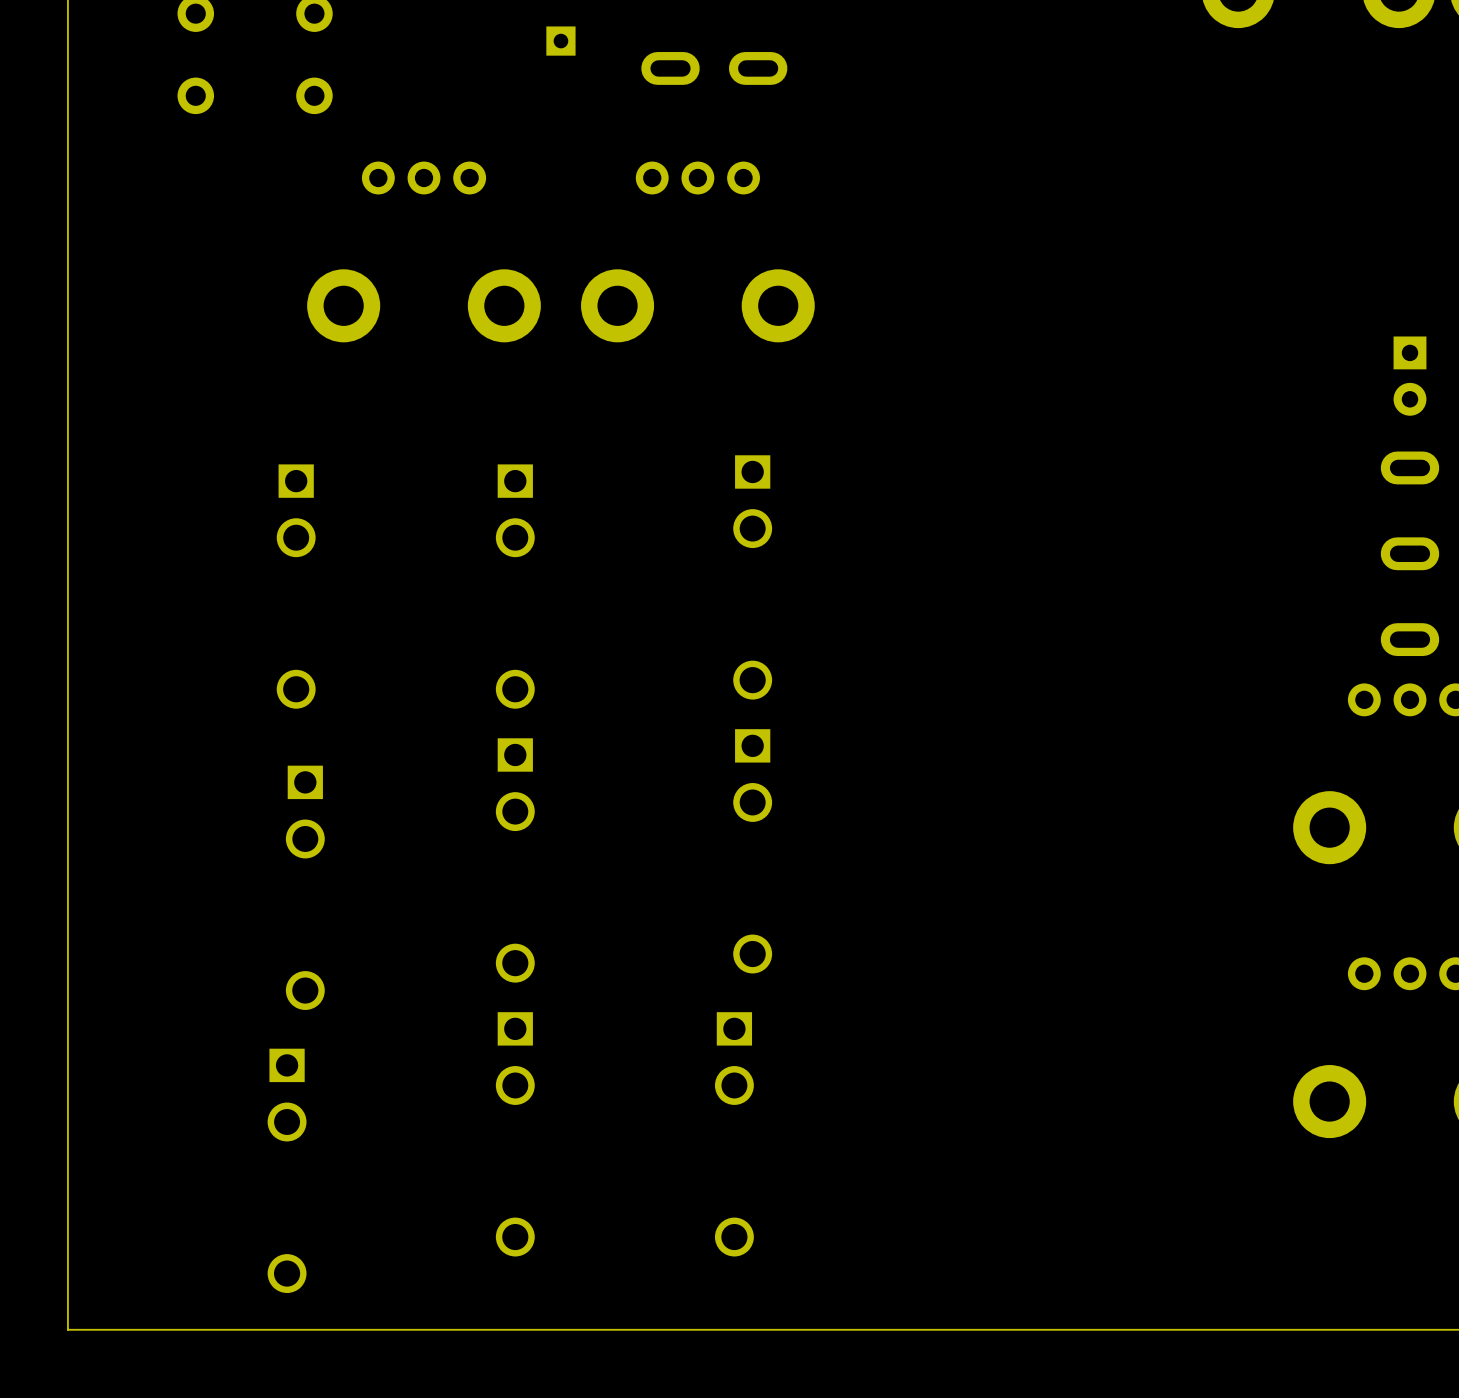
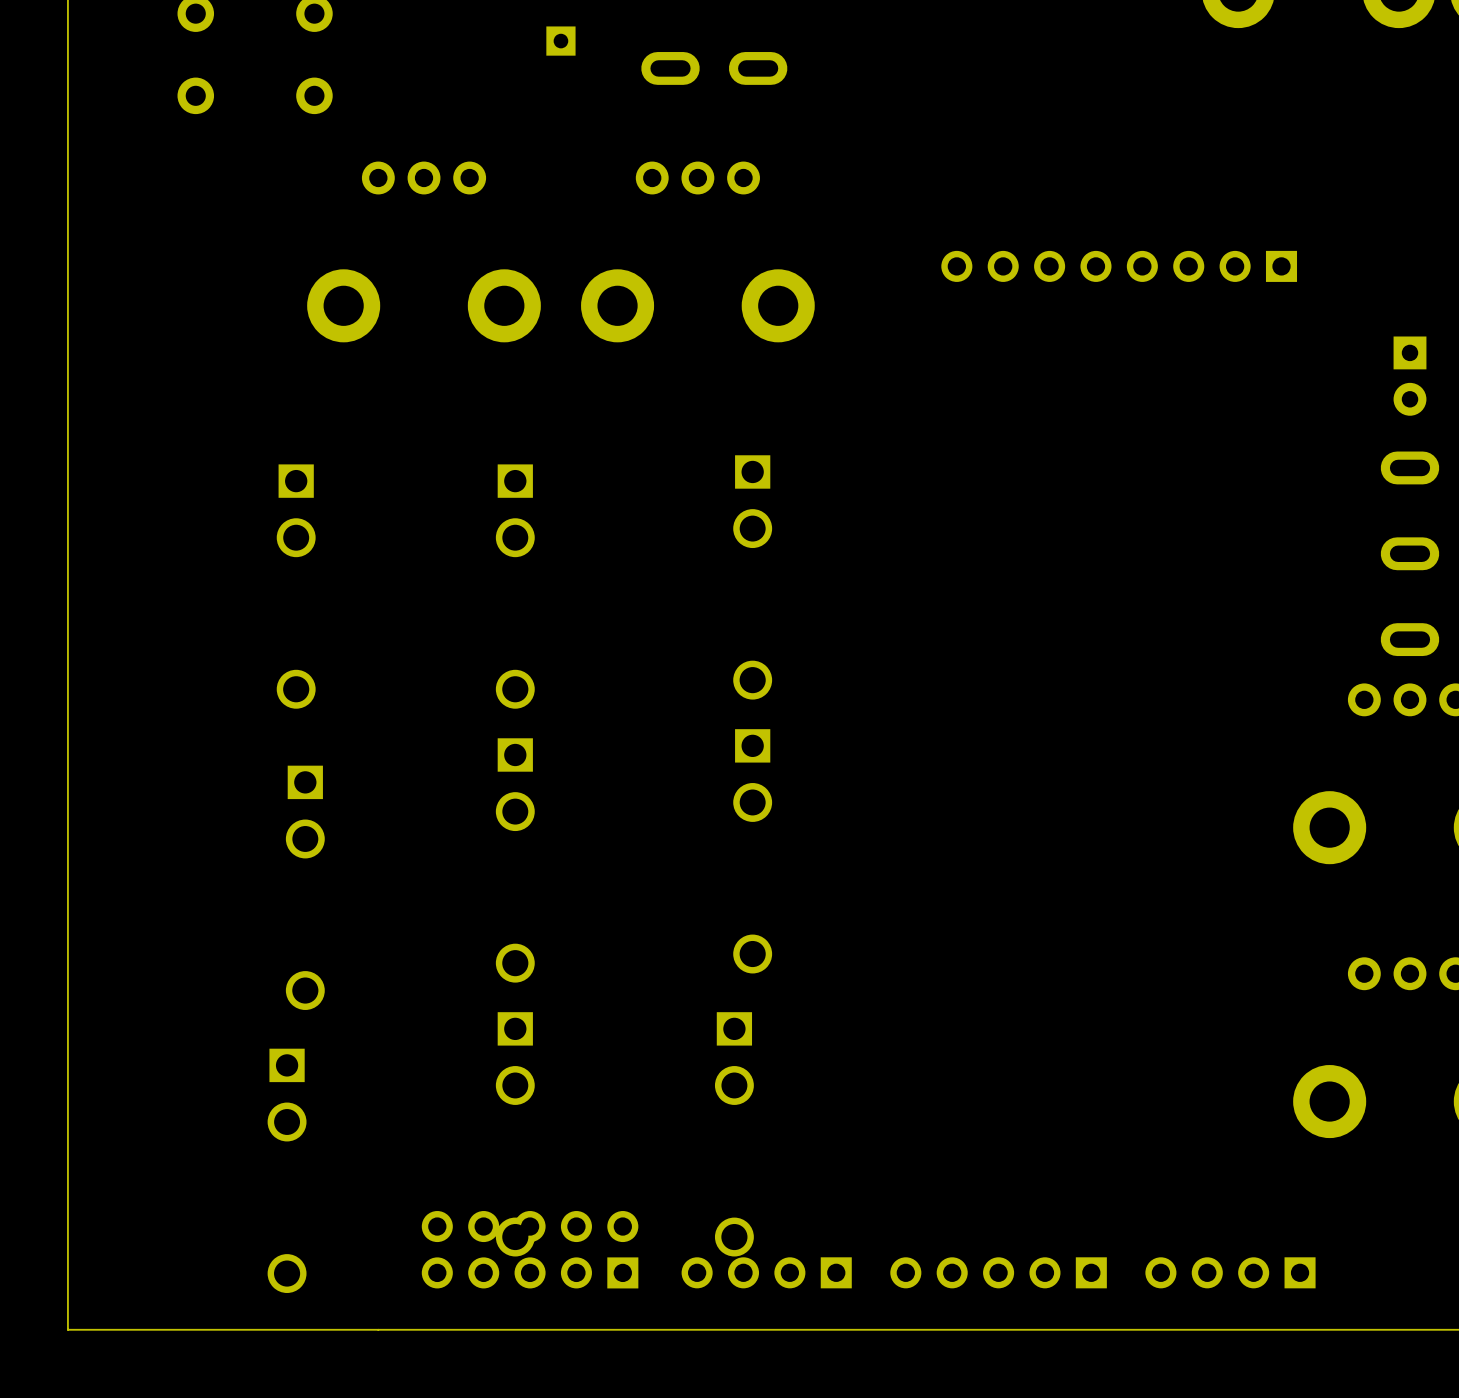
part: none -> (1119, 266)
part: none -> (530, 1249)
part: none -> (766, 1272)
part: none -> (998, 1272)
part: none -> (1230, 1272)

